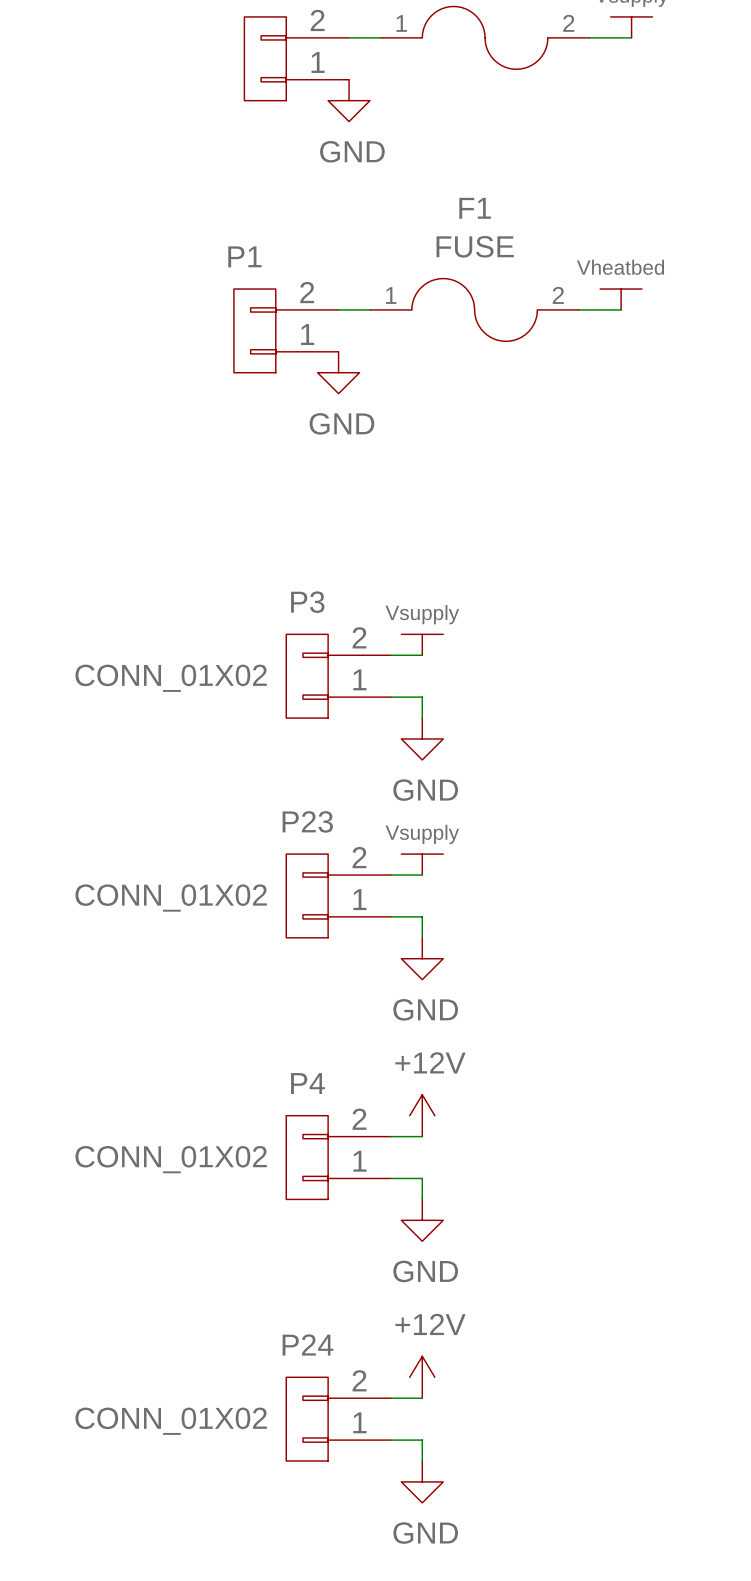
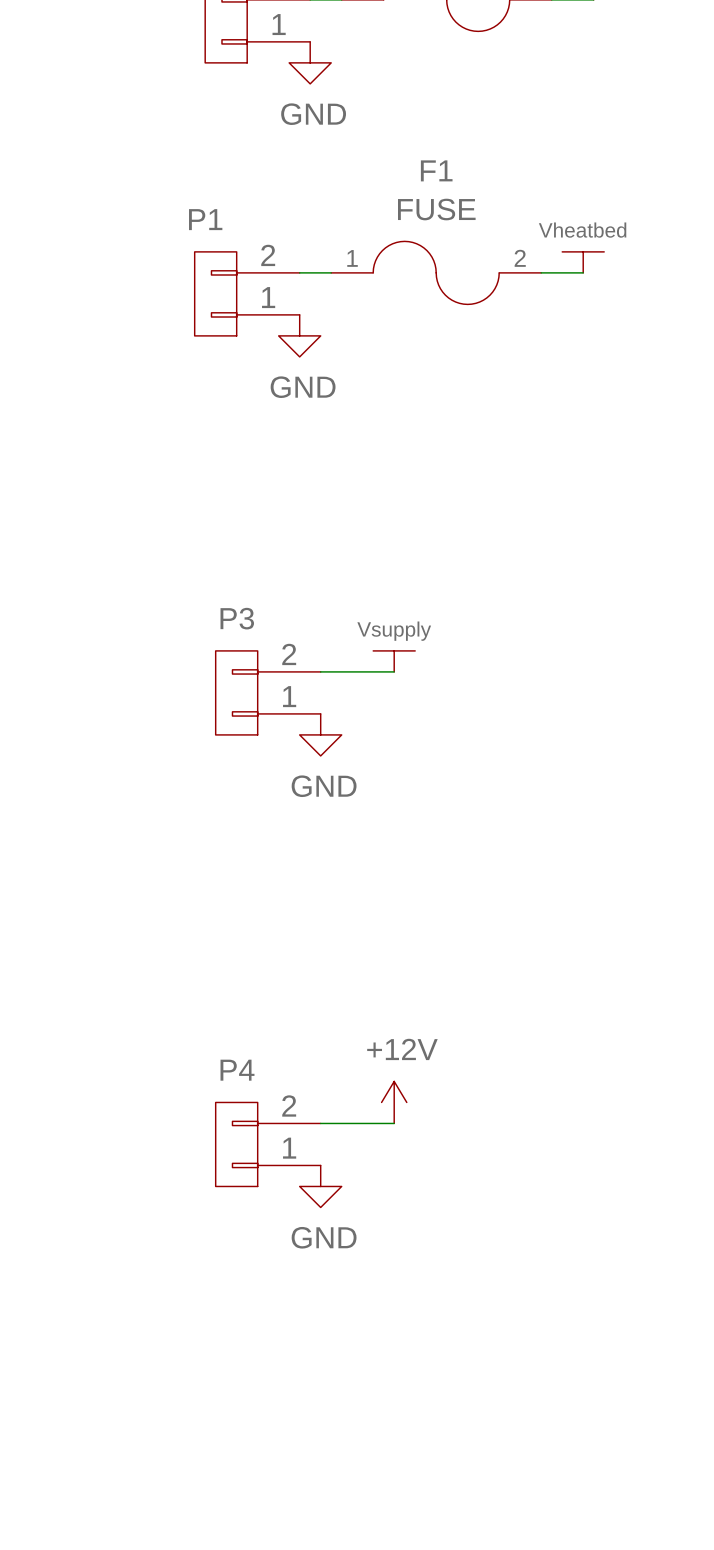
power symbol position: Vsupply (422, 644) -> Vsupply (394, 661)
wire: (390, 655) (422, 655) -> none
P3 position: (338, 676) -> (268, 692)
P3 value: CONN_01X02 (171, 678) -> none
wire: (390, 697) (422, 697) (422, 718) -> none
wire: none -> (320, 671) (394, 671)
power symbol position: GND (422, 738) -> GND (320, 734)
power symbol: Vsupply (422, 864) -> none
wire: (390, 875) (422, 875) -> none
P23: CONN_01X02 (338, 895) -> none
wire: (390, 916) (422, 916) (422, 937) -> none
power symbol: GND (422, 958) -> none
power symbol position: +12V (422, 1115) -> +12V (394, 1102)
wire: (390, 1136) (422, 1136) -> none
P4 position: (338, 1157) -> (268, 1144)
wire: none -> (320, 1123) (394, 1123)
P4 value: CONN_01X02 (171, 1159) -> none
wire: (390, 1178) (422, 1178) (422, 1199) -> none
power symbol position: GND (422, 1220) -> GND (320, 1186)
power symbol: +12V (422, 1377) -> none
wire: (390, 1398) (422, 1398) -> none
P24: CONN_01X02 (338, 1419) -> none
wire: (390, 1440) (422, 1440) (422, 1461) -> none
power symbol: GND (422, 1481) -> none

